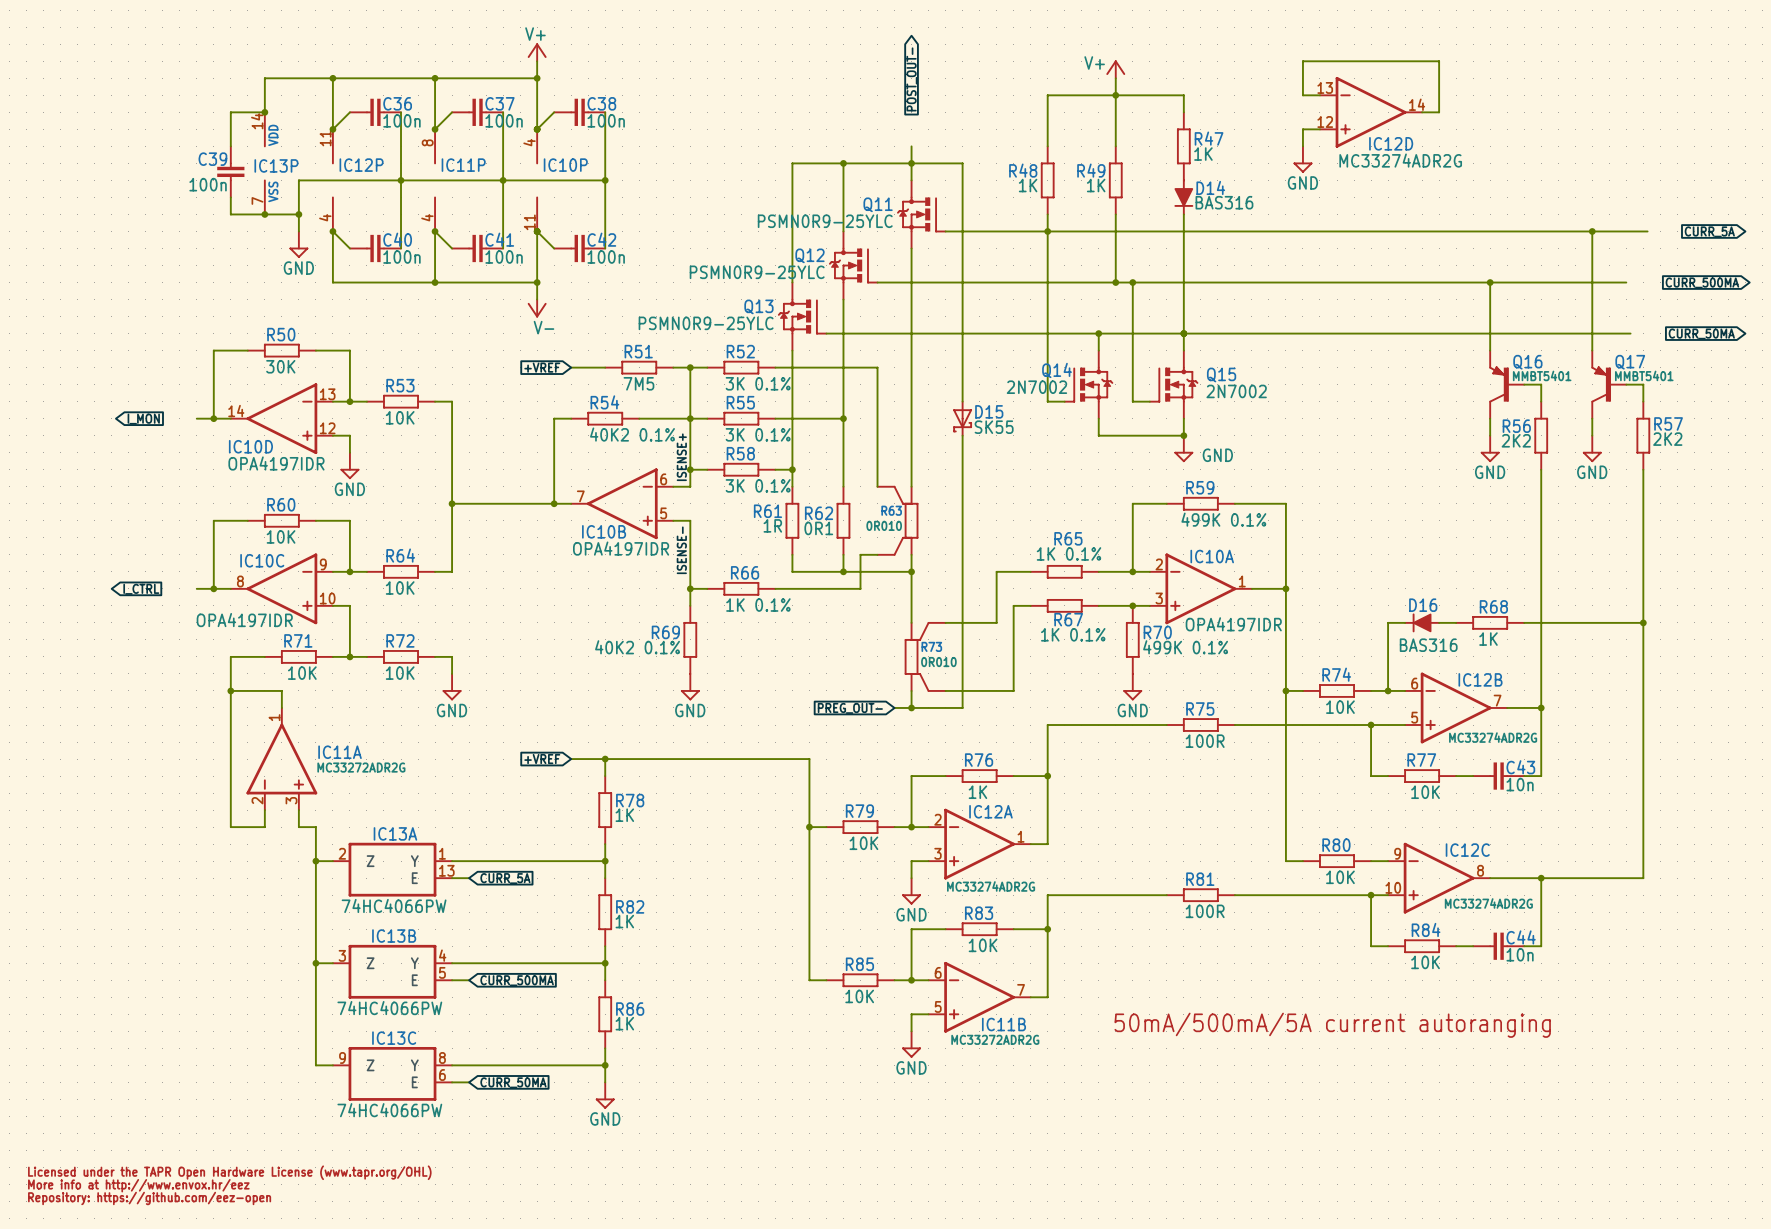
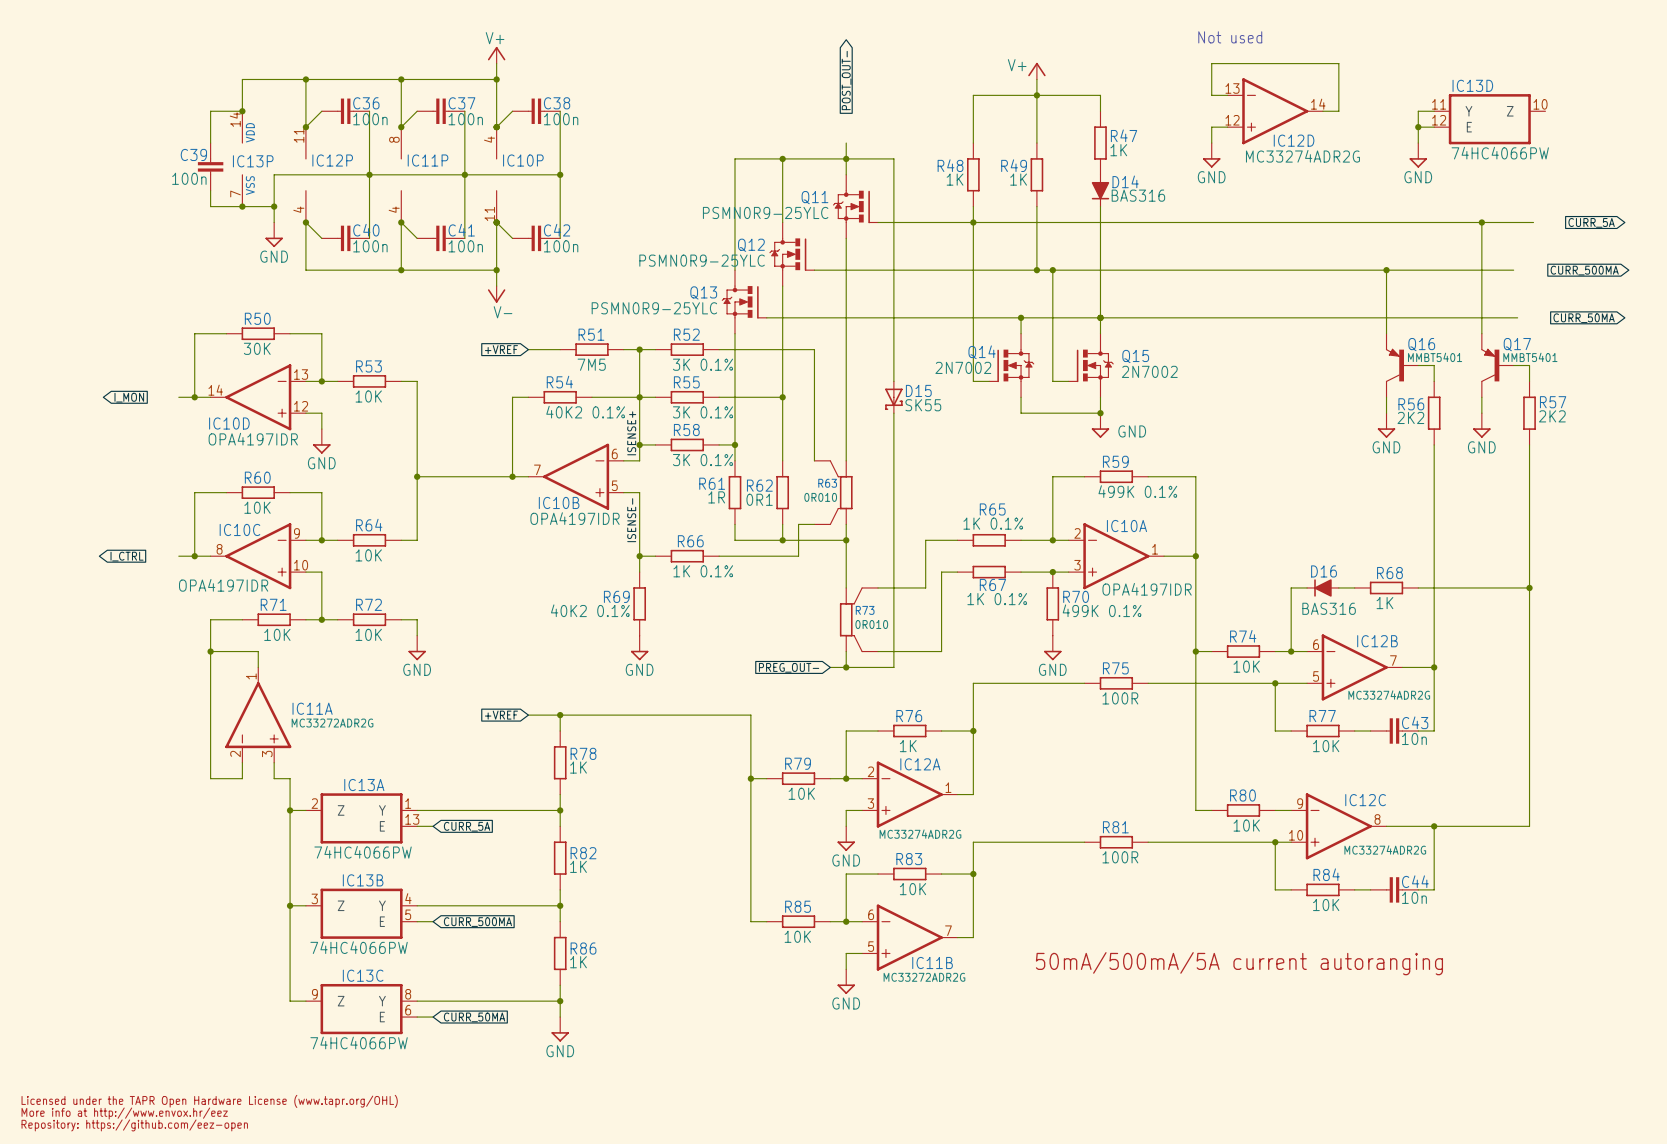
text: none -> Not used (1230, 37)
wire: none -> (1434, 111) (1418, 111) (1418, 143)
IC13D: none -> 74HC4066PW (1489, 119)
wire: none -> (1418, 127) (1434, 127)
junction: none -> (1418, 127)
power symbol: none -> GND (1418, 155)

